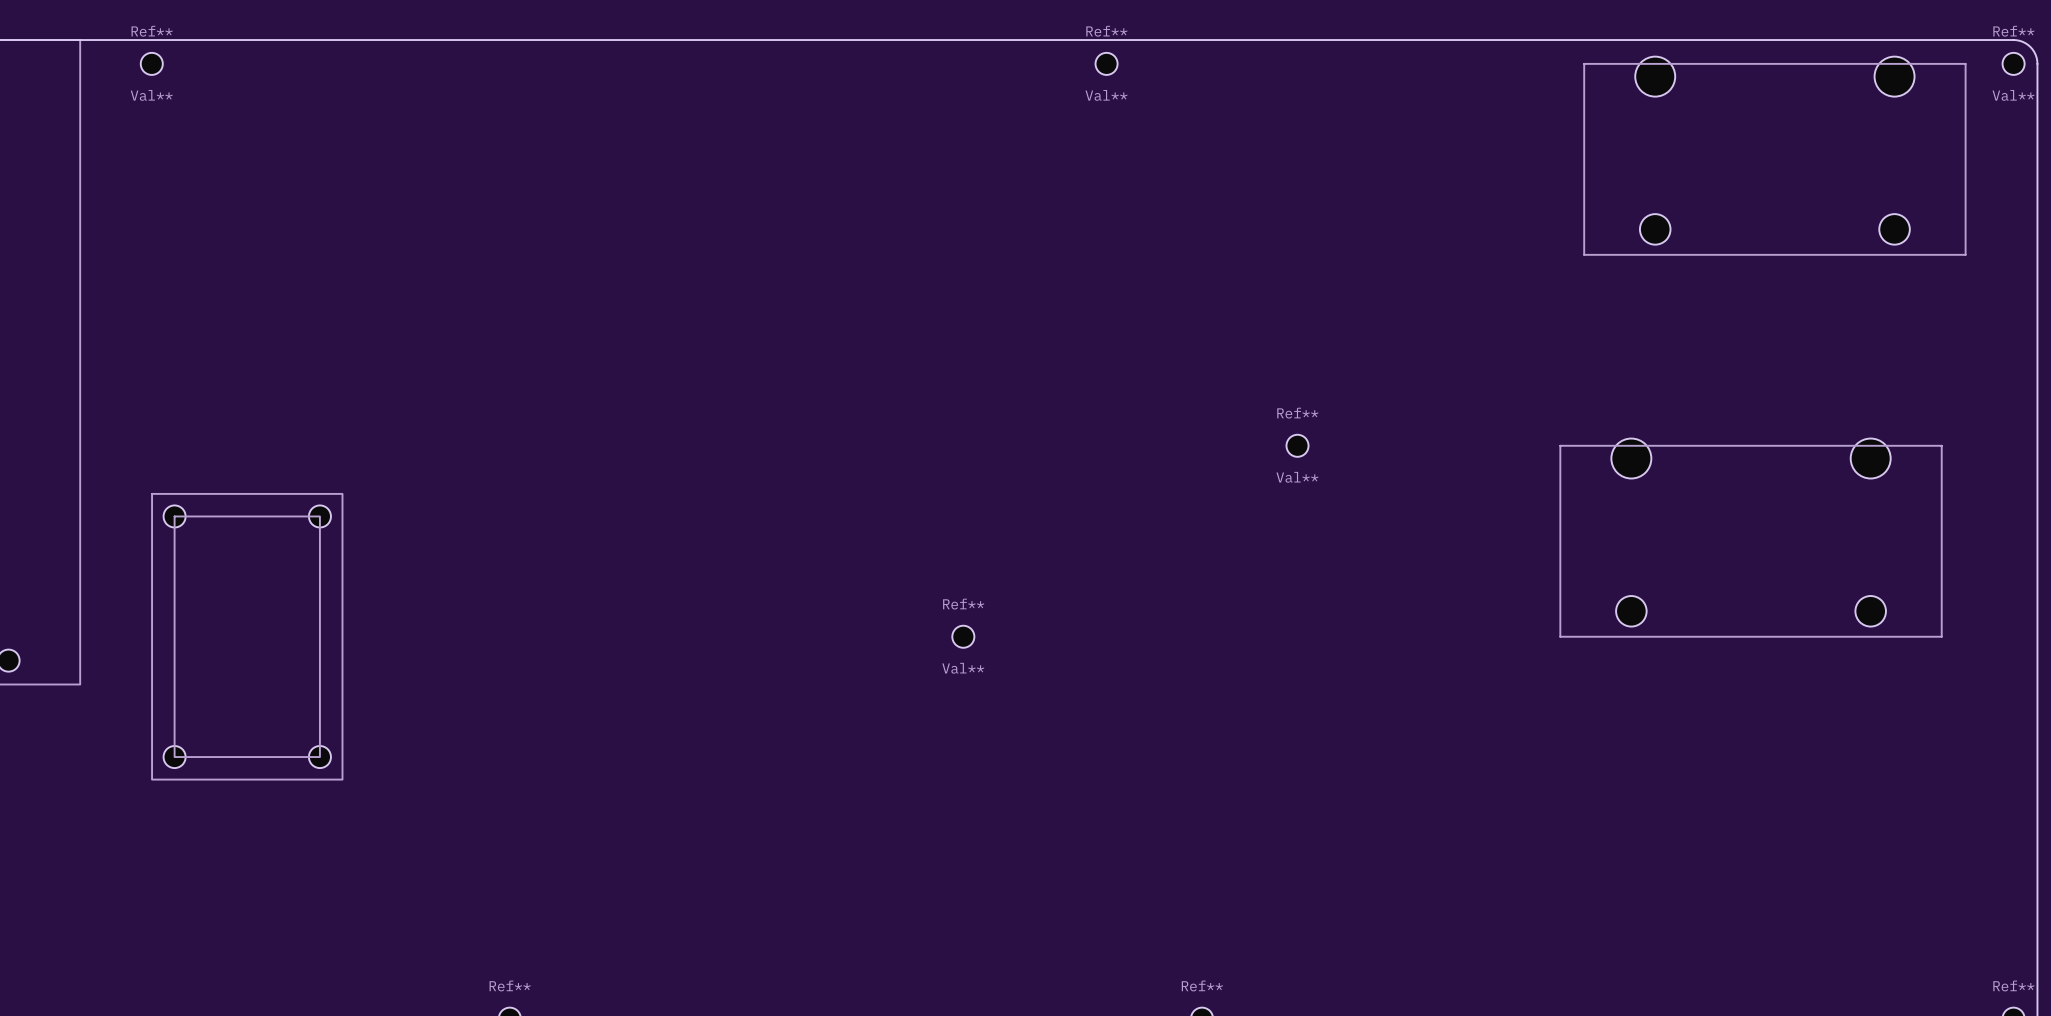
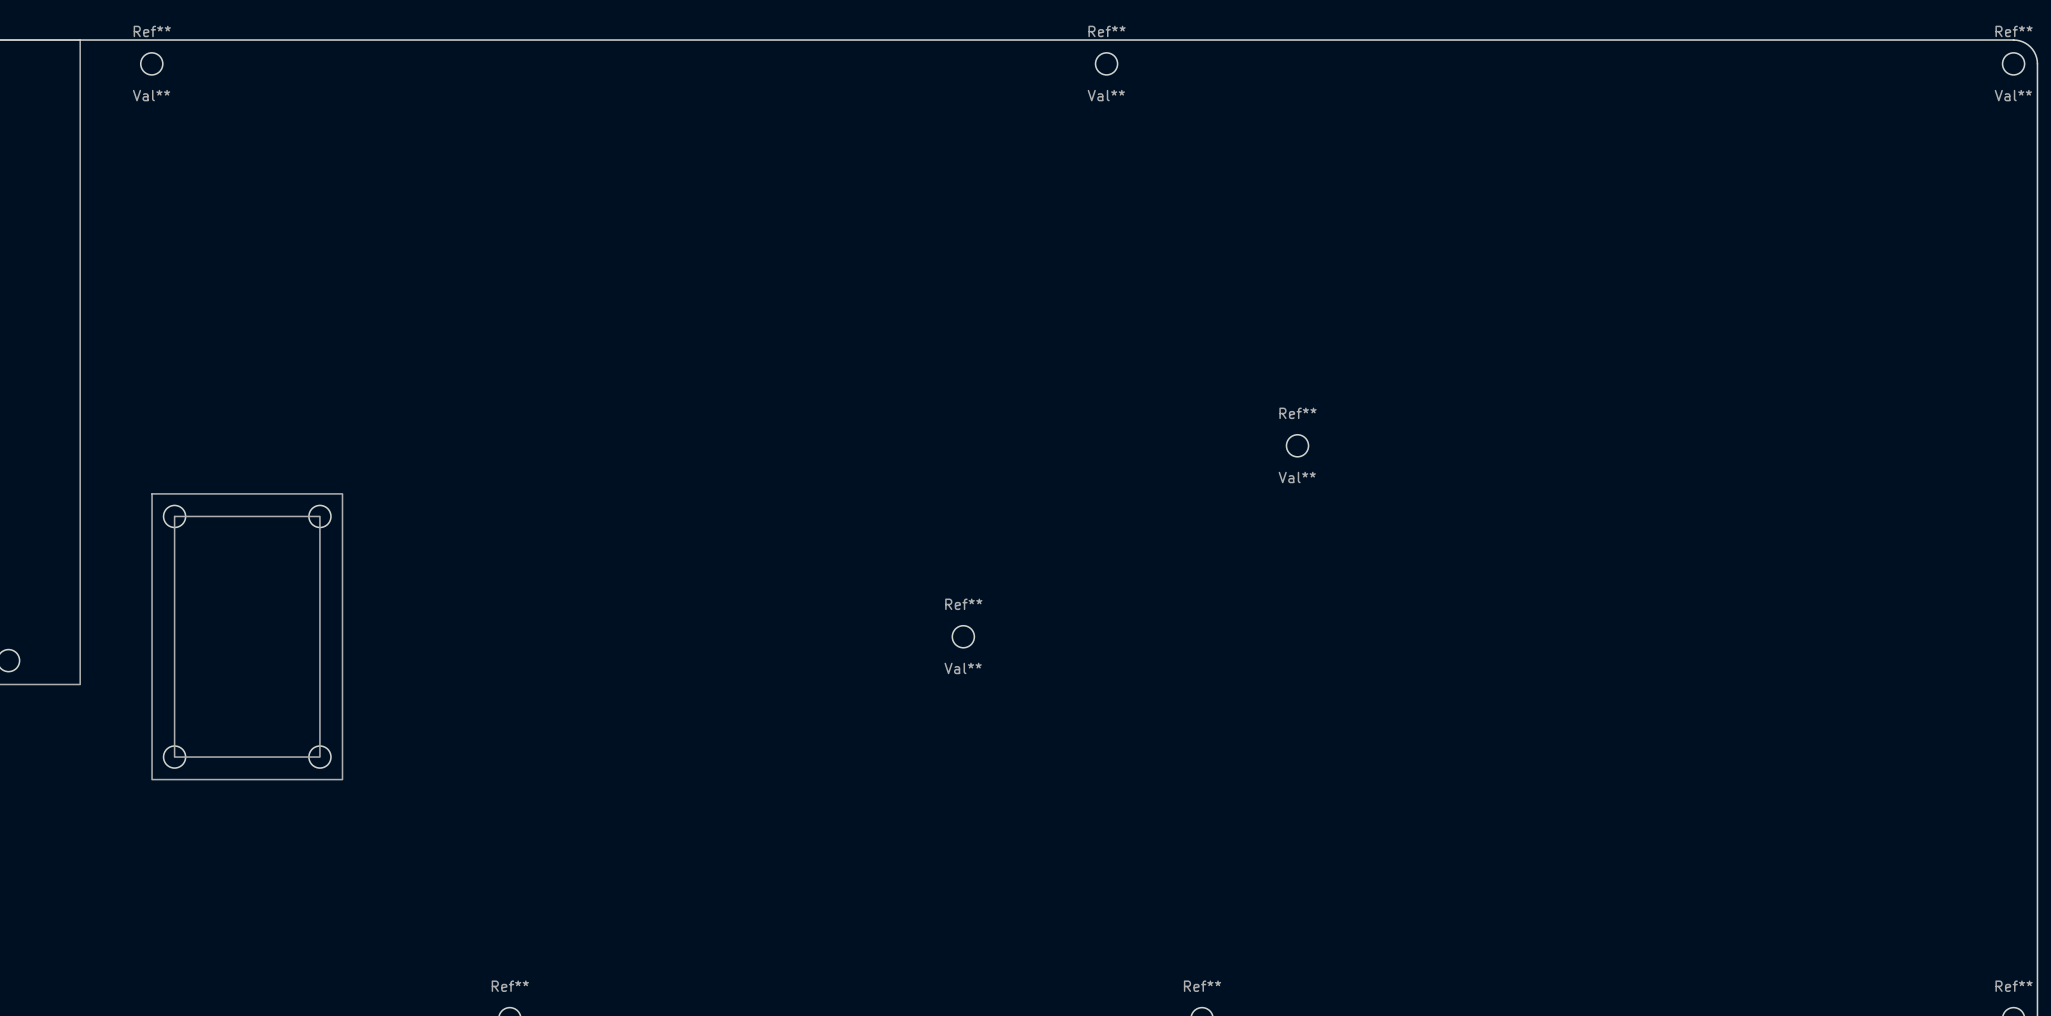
part: (1774, 156) -> none
part: (1751, 538) -> none

